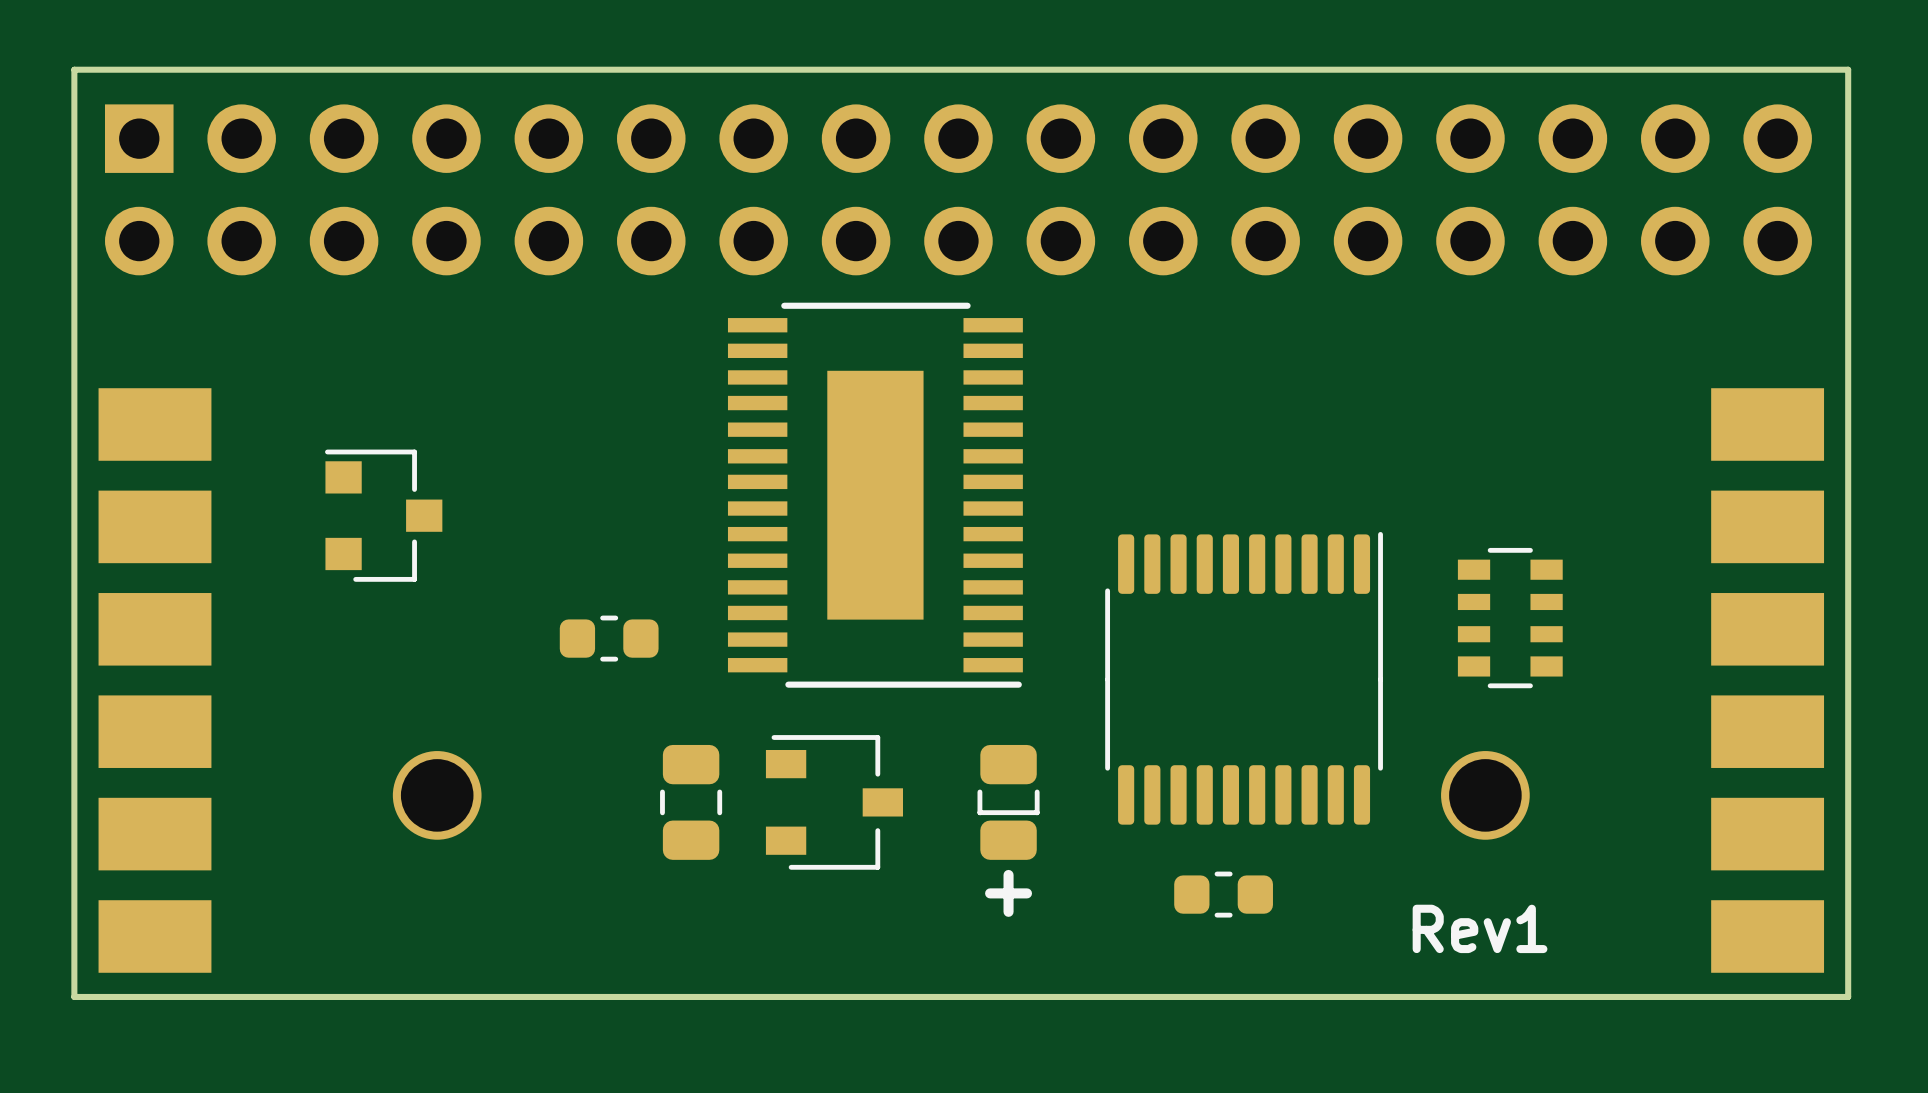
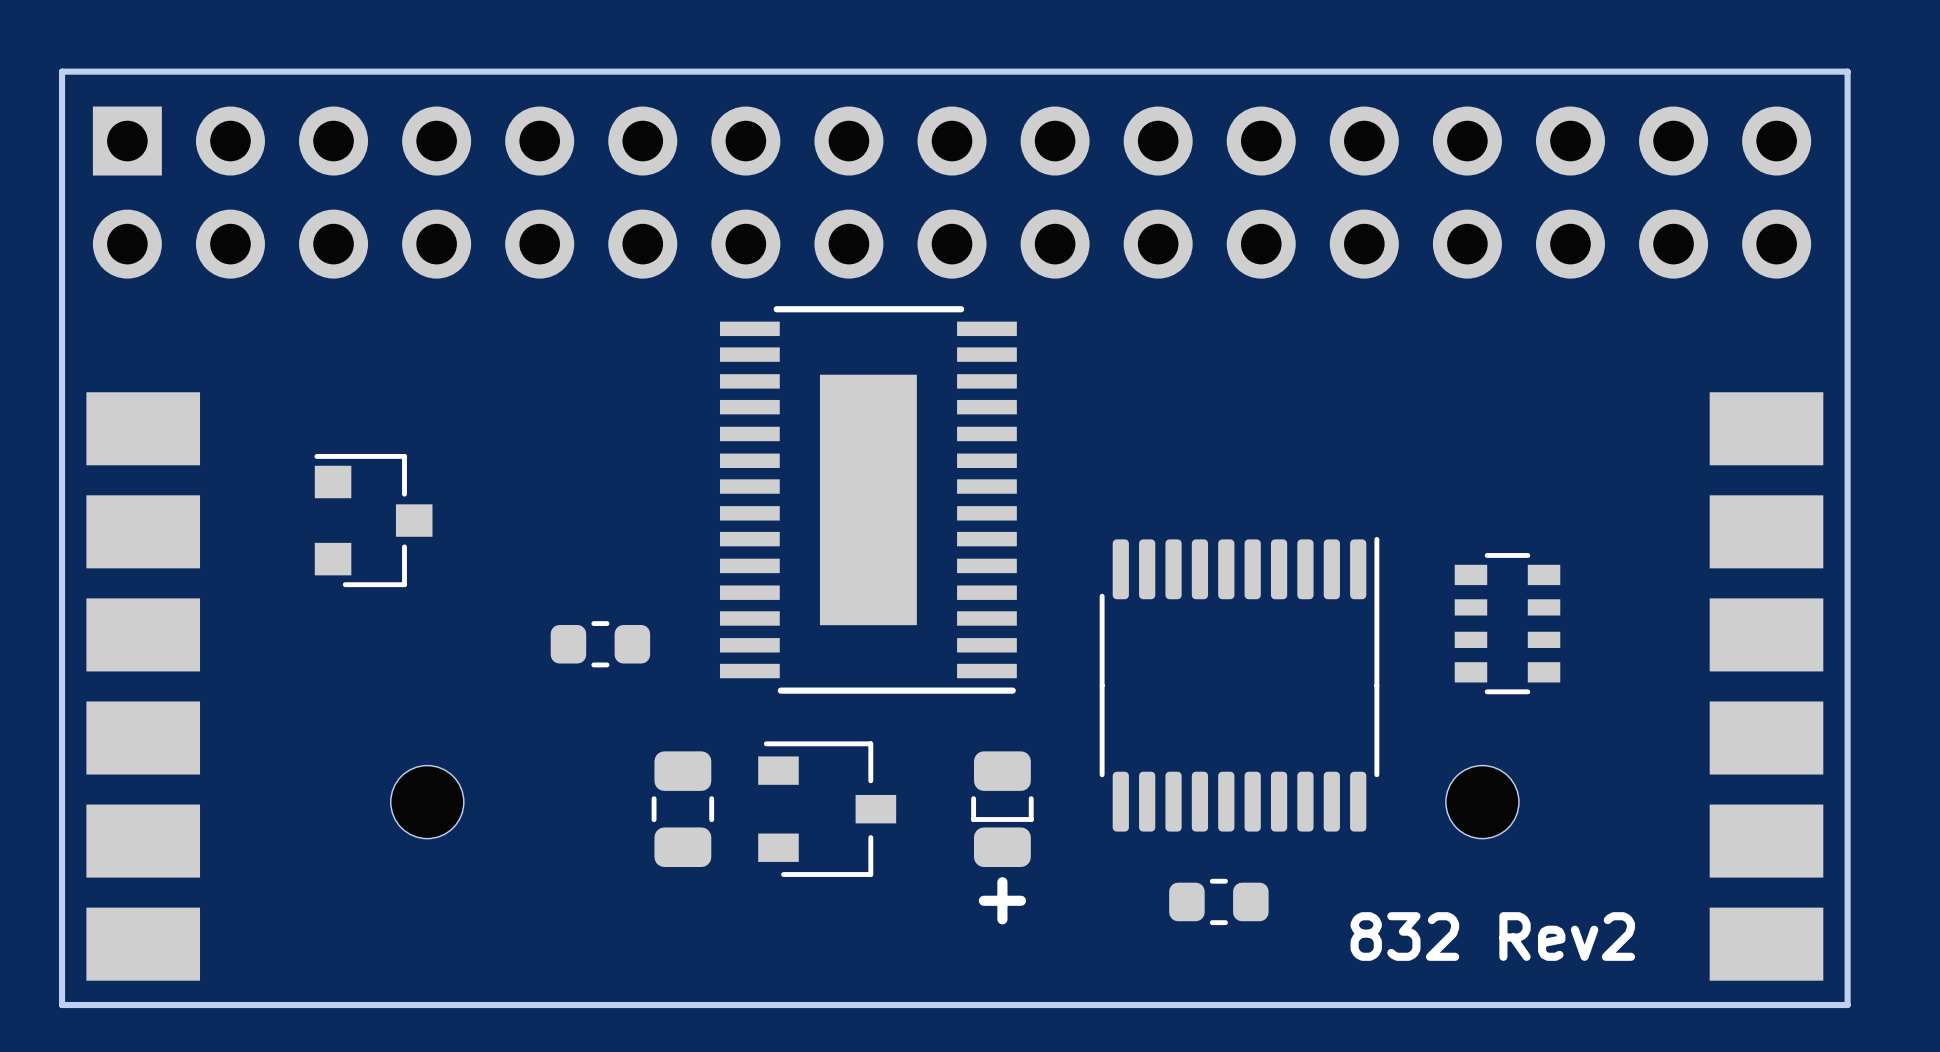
part footprint: [392, 751, 482, 840] -> [390, 765, 464, 839]
part footprint: [1441, 751, 1530, 840] -> [1445, 765, 1519, 839]
text: Rev1 (1480, 928) -> none
text: none -> 832 Rev2 (1492, 936)

